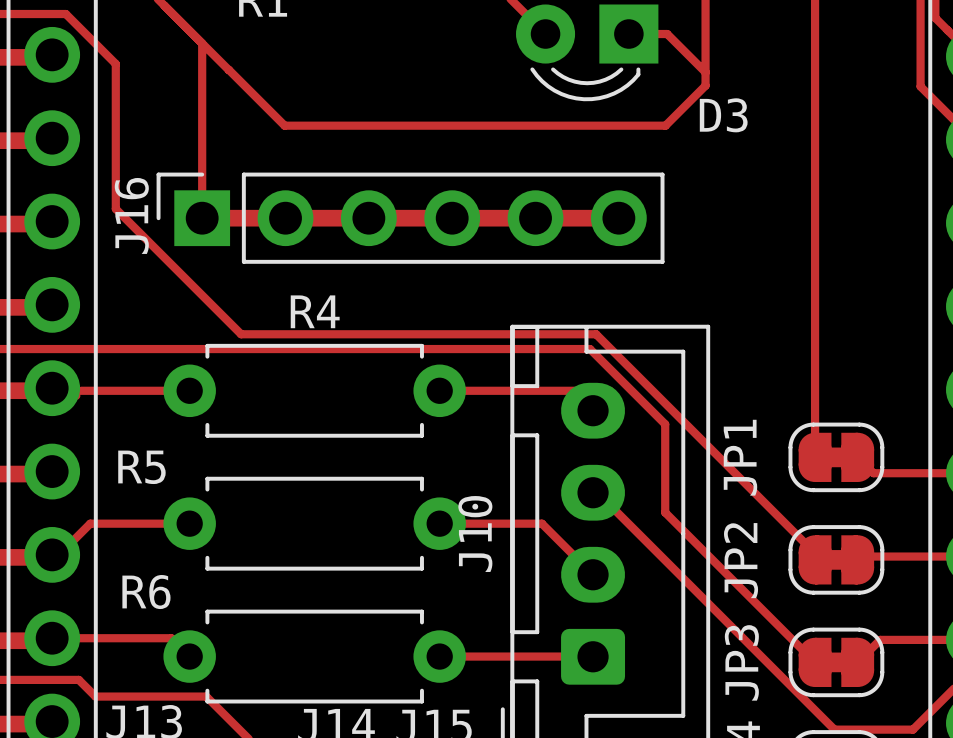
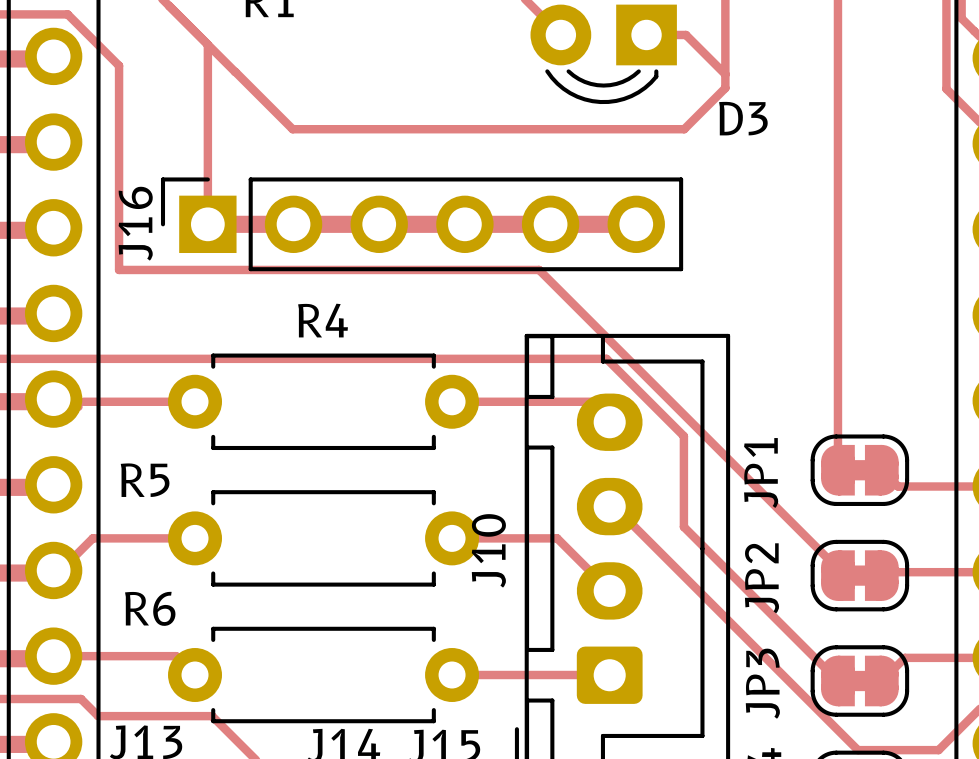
top track: (115, 208) (241, 334) (596, 334) -> (119, 214) (119, 269) (539, 269) (612, 343)

